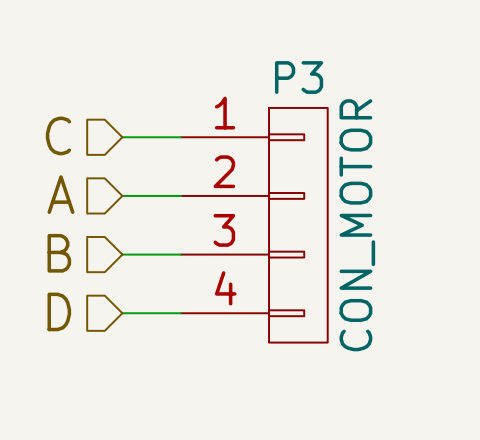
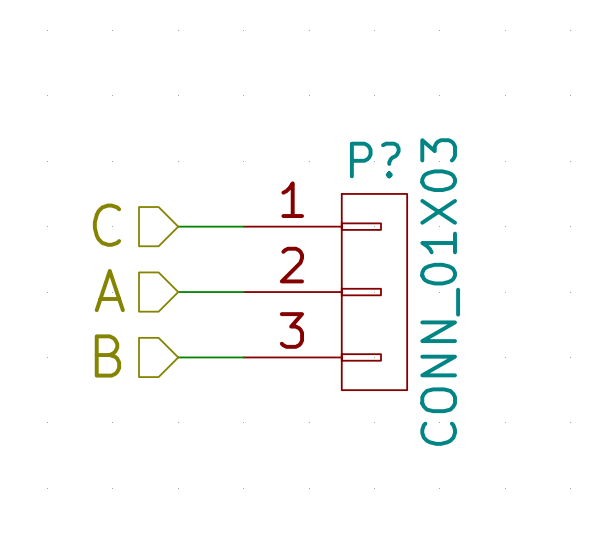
P?: none -> CONN_01X03 (325, 292)
P3: CON_MOTOR (254, 225) -> none
hierarchical label: D (59, 311) -> none
wire: (122, 313) (181, 313) -> none

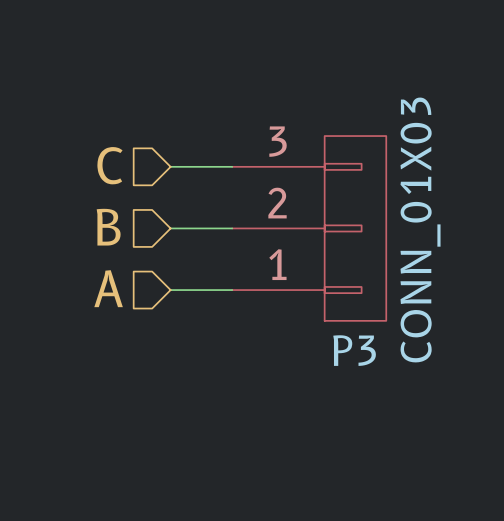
P? name: P? (375, 160) -> P3 (354, 350)
hierarchical label: A (109, 290) -> B (108, 227)
P? flip: as is (374, 292) -> up-down (355, 228)
hierarchical label: B (107, 355) -> A (108, 288)

